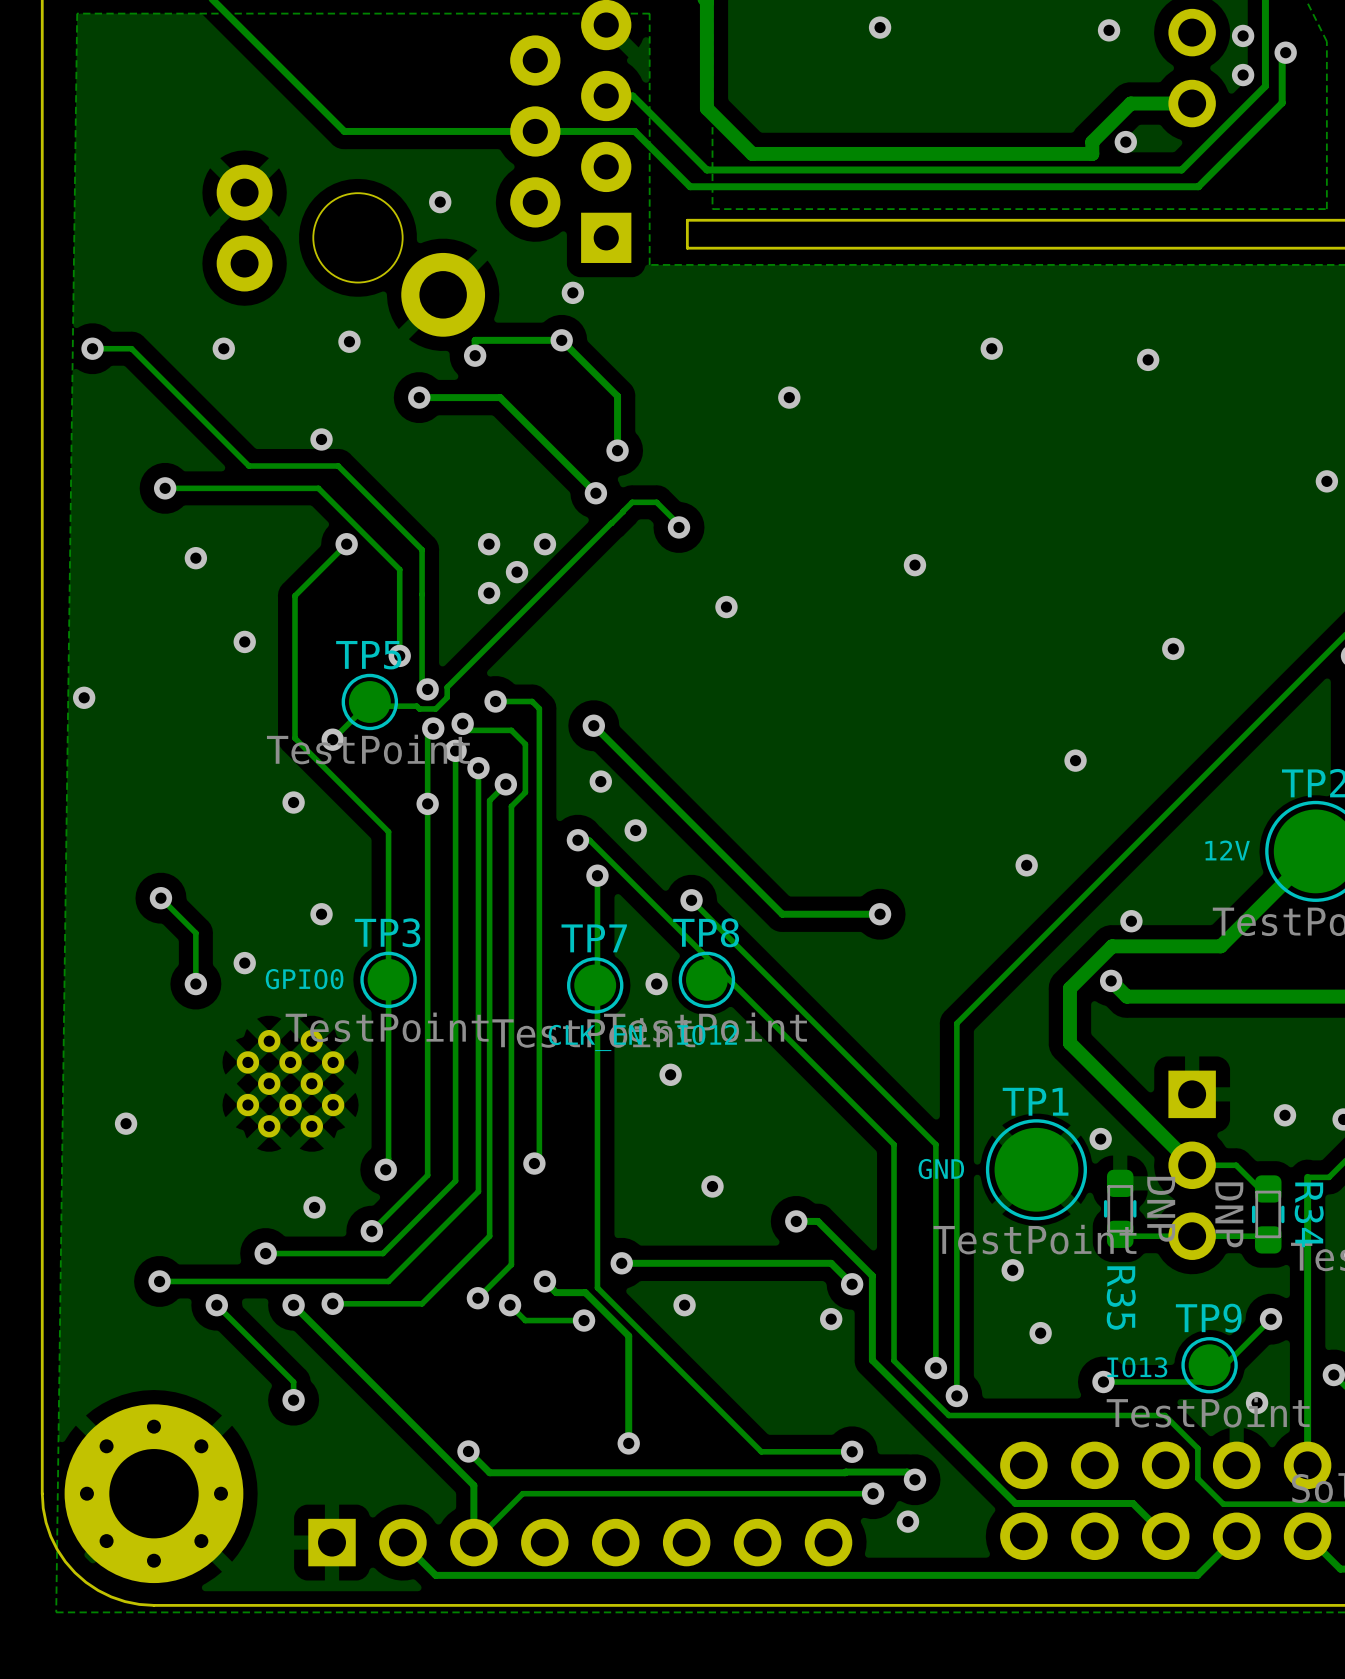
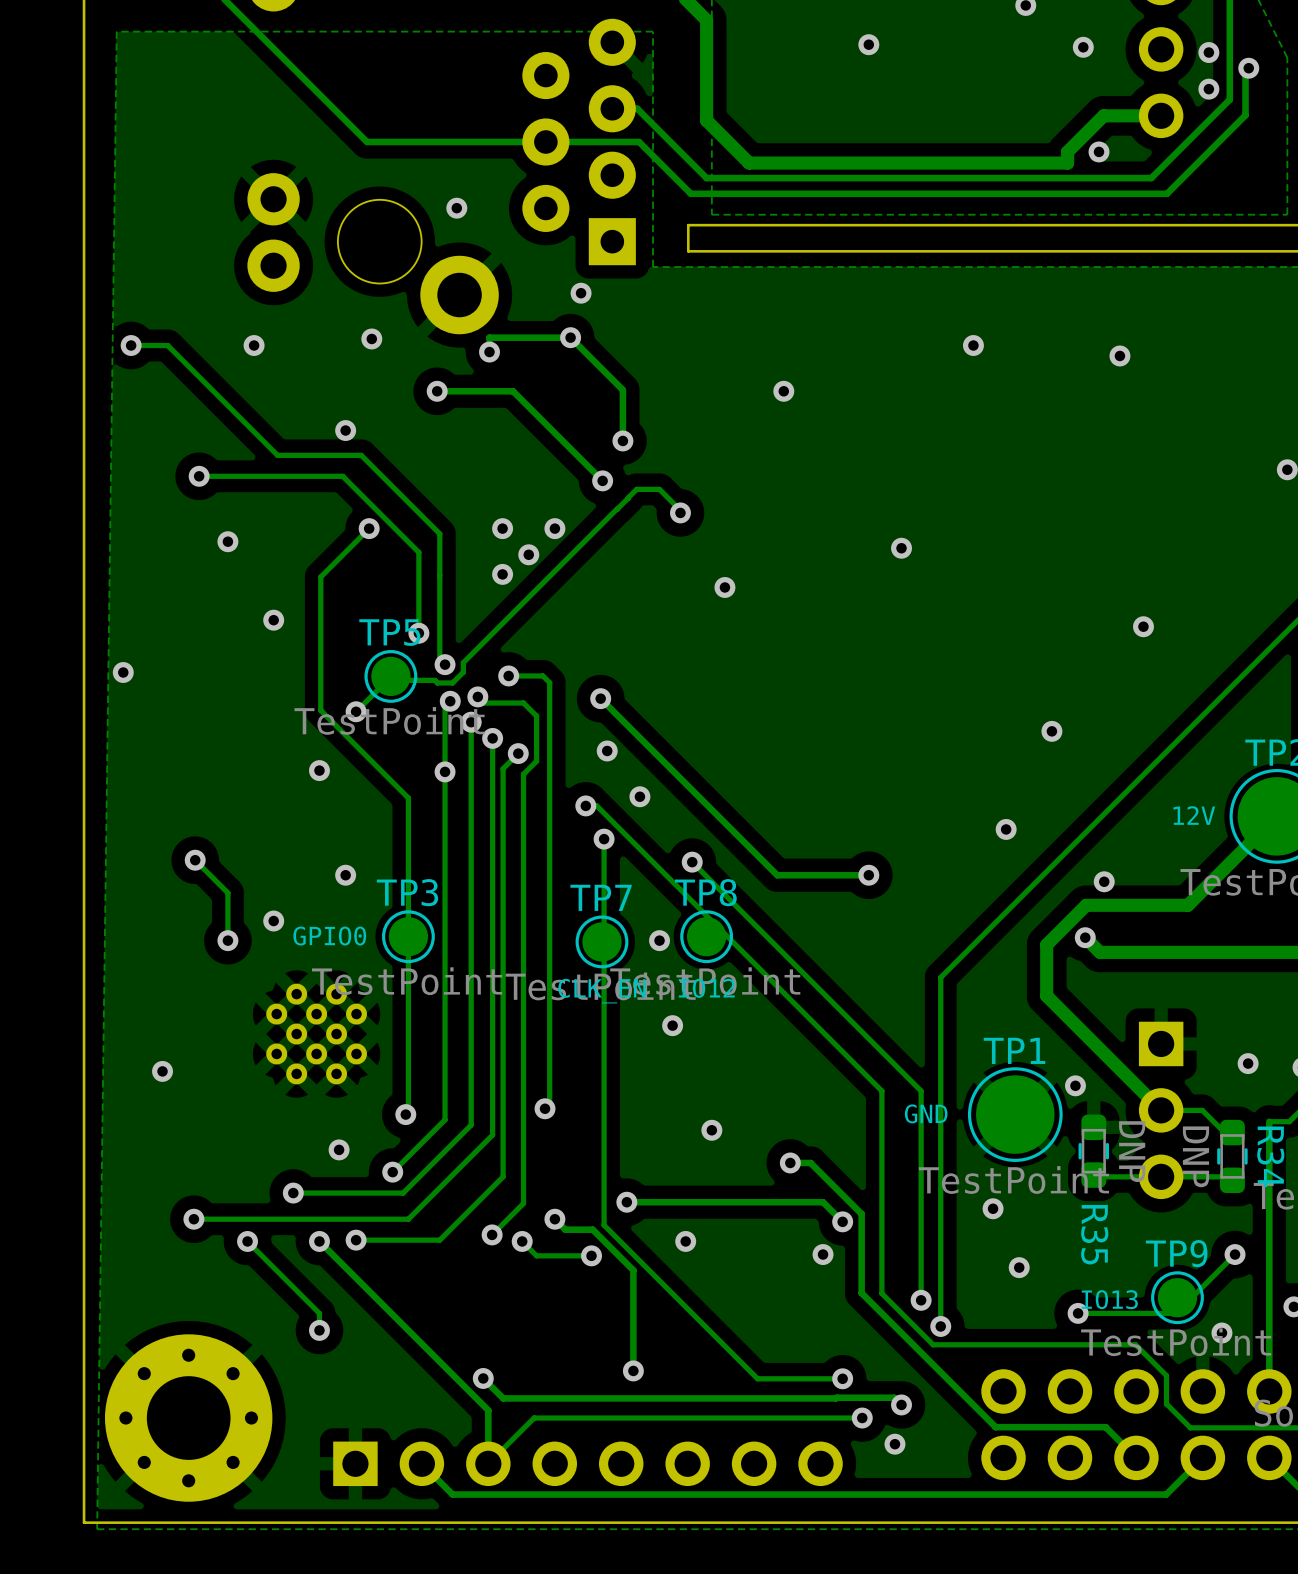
board edge: (42, 1493) (43, 1508) (50, 1536) (65, 1561) (74, 1572) (98, 1590) (111, 1596) (139, 1604) (153, 1605) -> (84, 1418) (84, 1522) (188, 1522)

